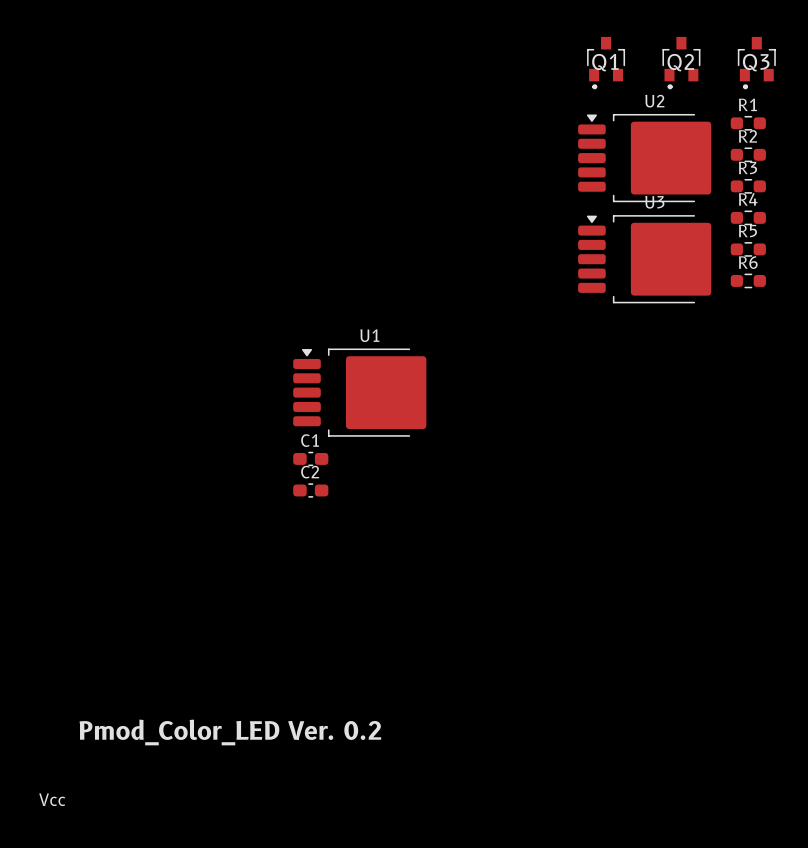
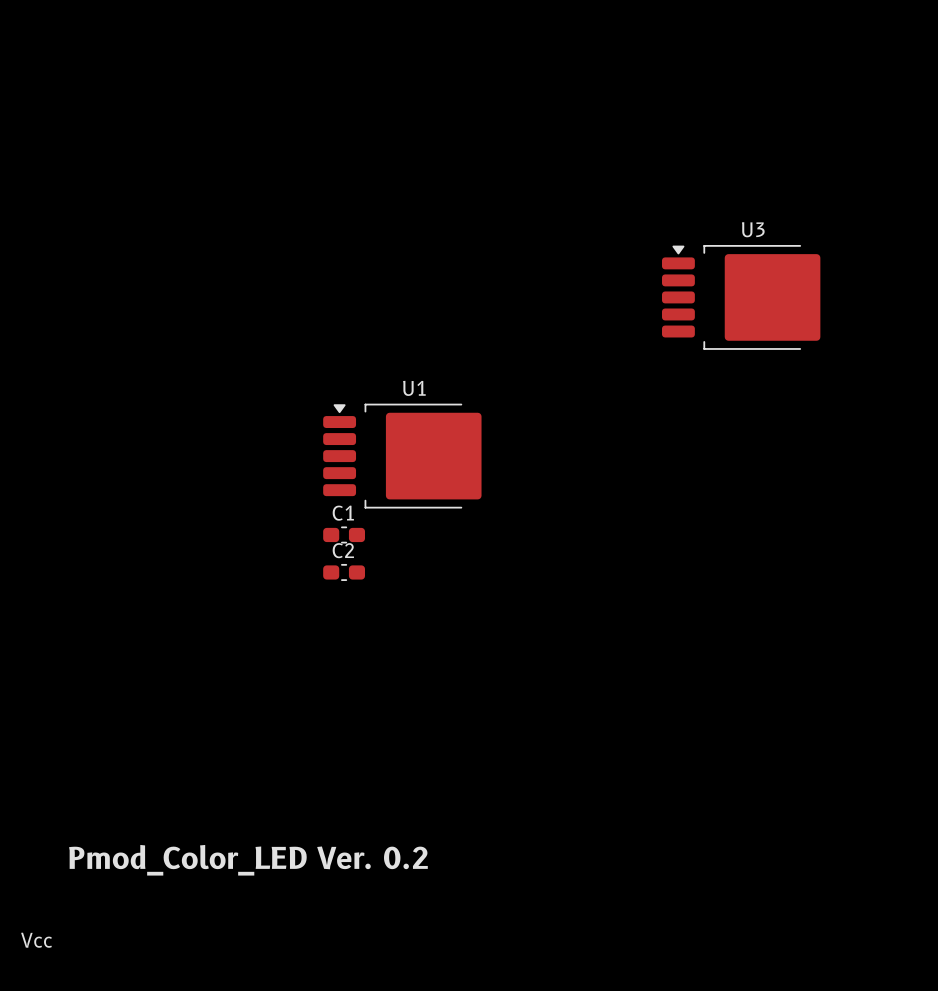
Q1: (606, 63) -> none
Q2: (681, 63) -> none
Q3: (756, 63) -> none
R1: (748, 123) -> none
R2: (748, 154) -> none
U2: (644, 158) -> none
R3: (748, 186) -> none
R4: (748, 217) -> none
R5: (748, 249) -> none
R6: (748, 280) -> none

